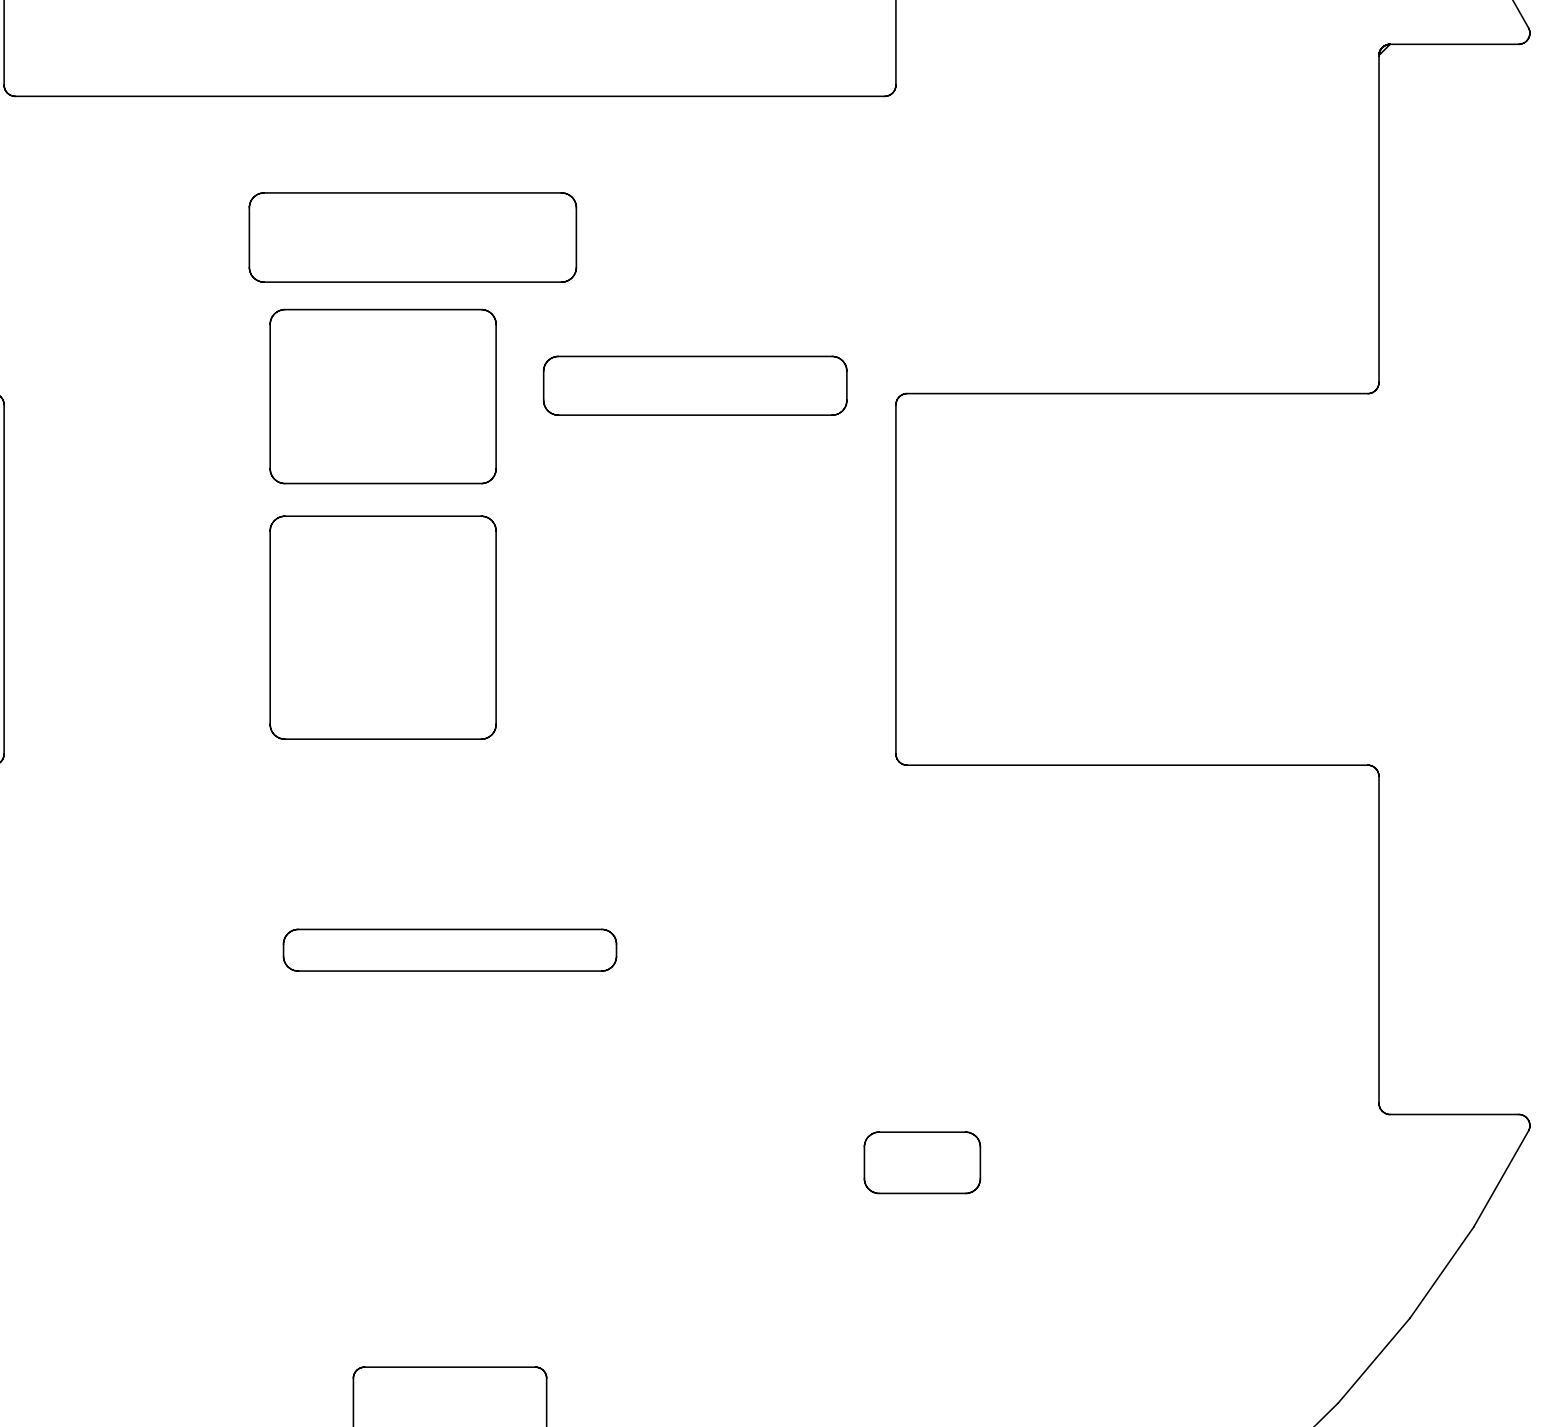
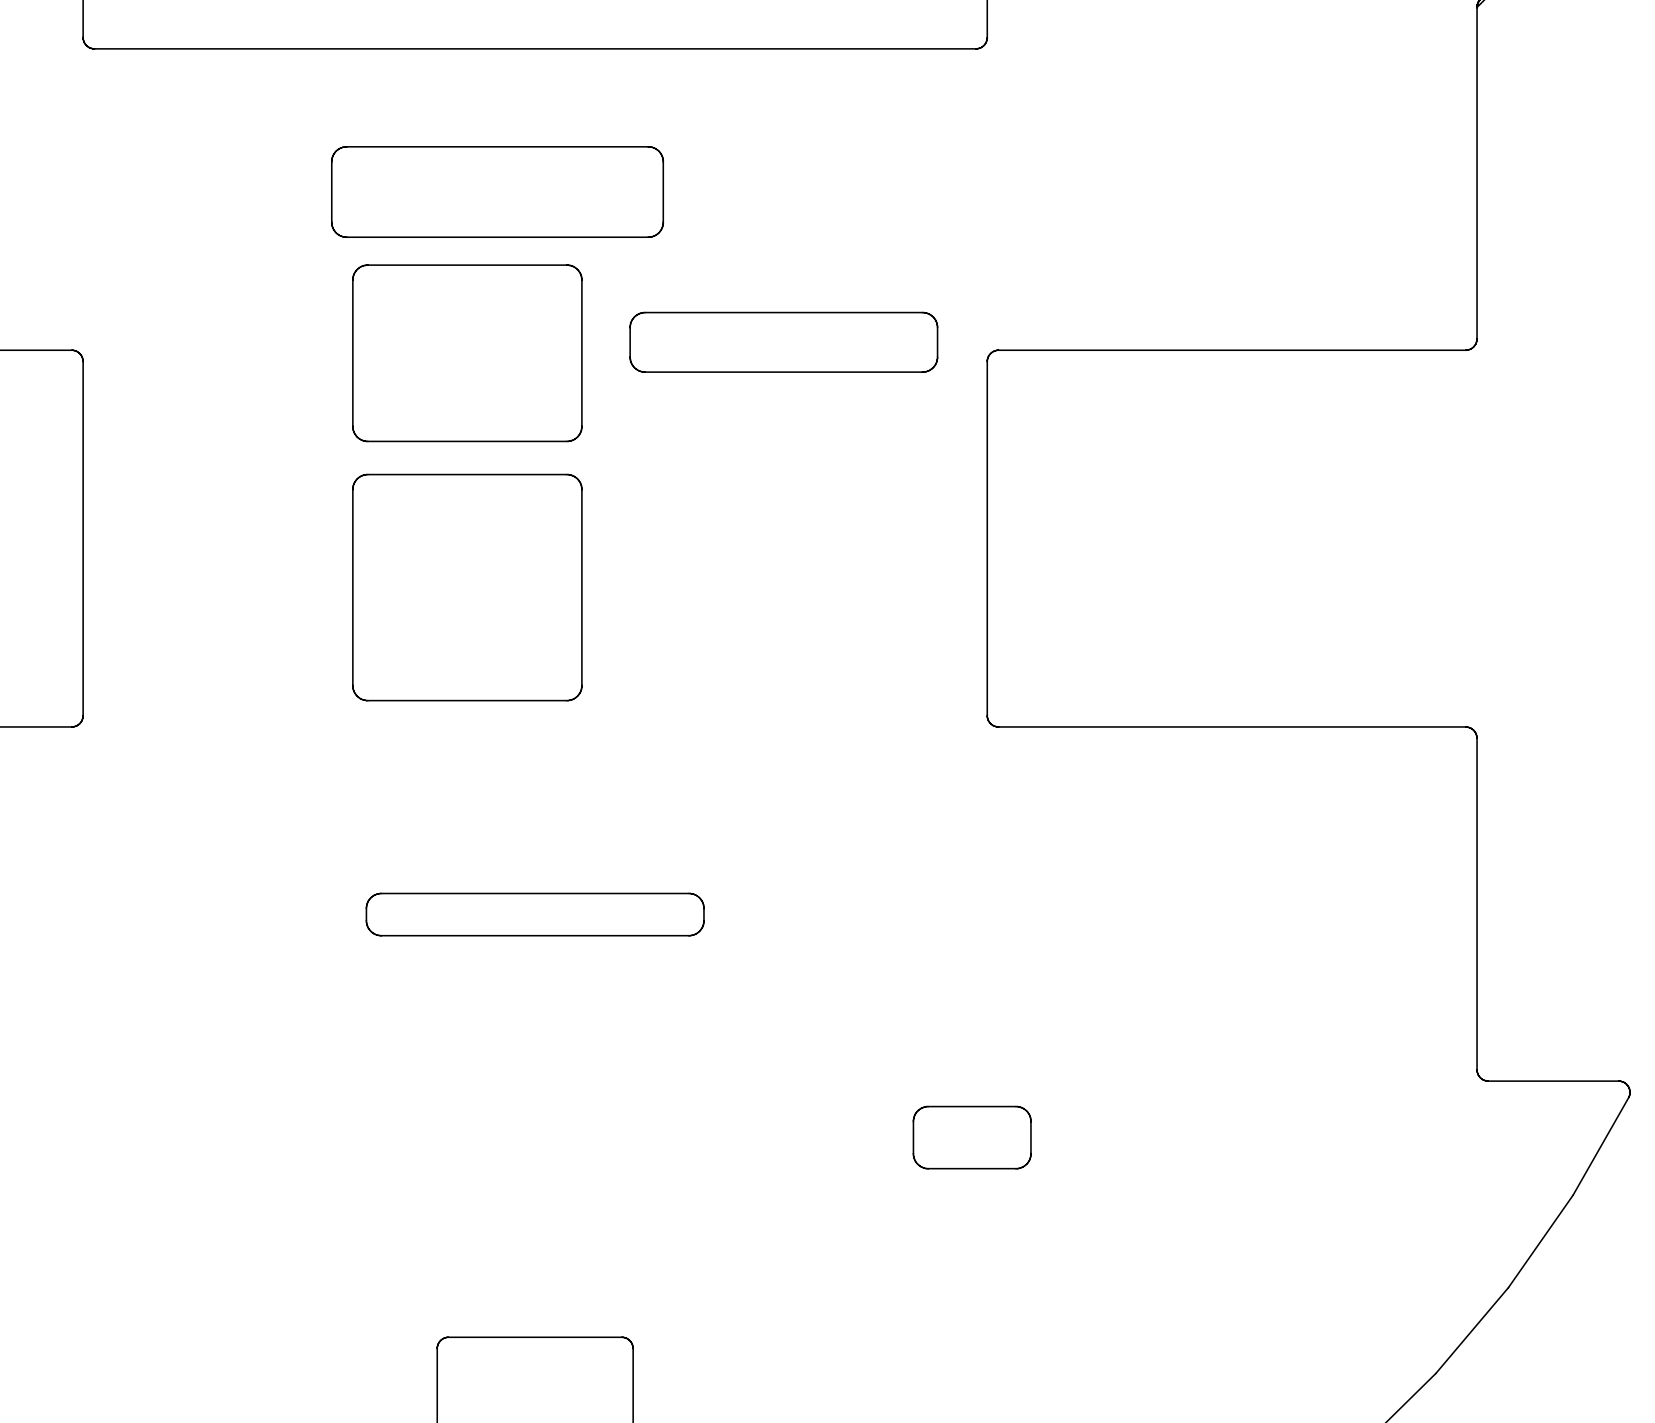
board edge: (877, 1132) (966, 1132) (972, 1134) (977, 1138) (980, 1145) (979, 1184) (972, 1191) (966, 1193) (877, 1193) (871, 1191) (867, 1187) (864, 1179) (864, 1145) (868, 1136) (877, 1132) -> (927, 1106) (1017, 1106) (1023, 1108) (1028, 1112) (1030, 1120) (1029, 1160) (1023, 1166) (1017, 1168) (927, 1168) (920, 1166) (916, 1162) (913, 1154) (913, 1120) (917, 1110) (927, 1106)

